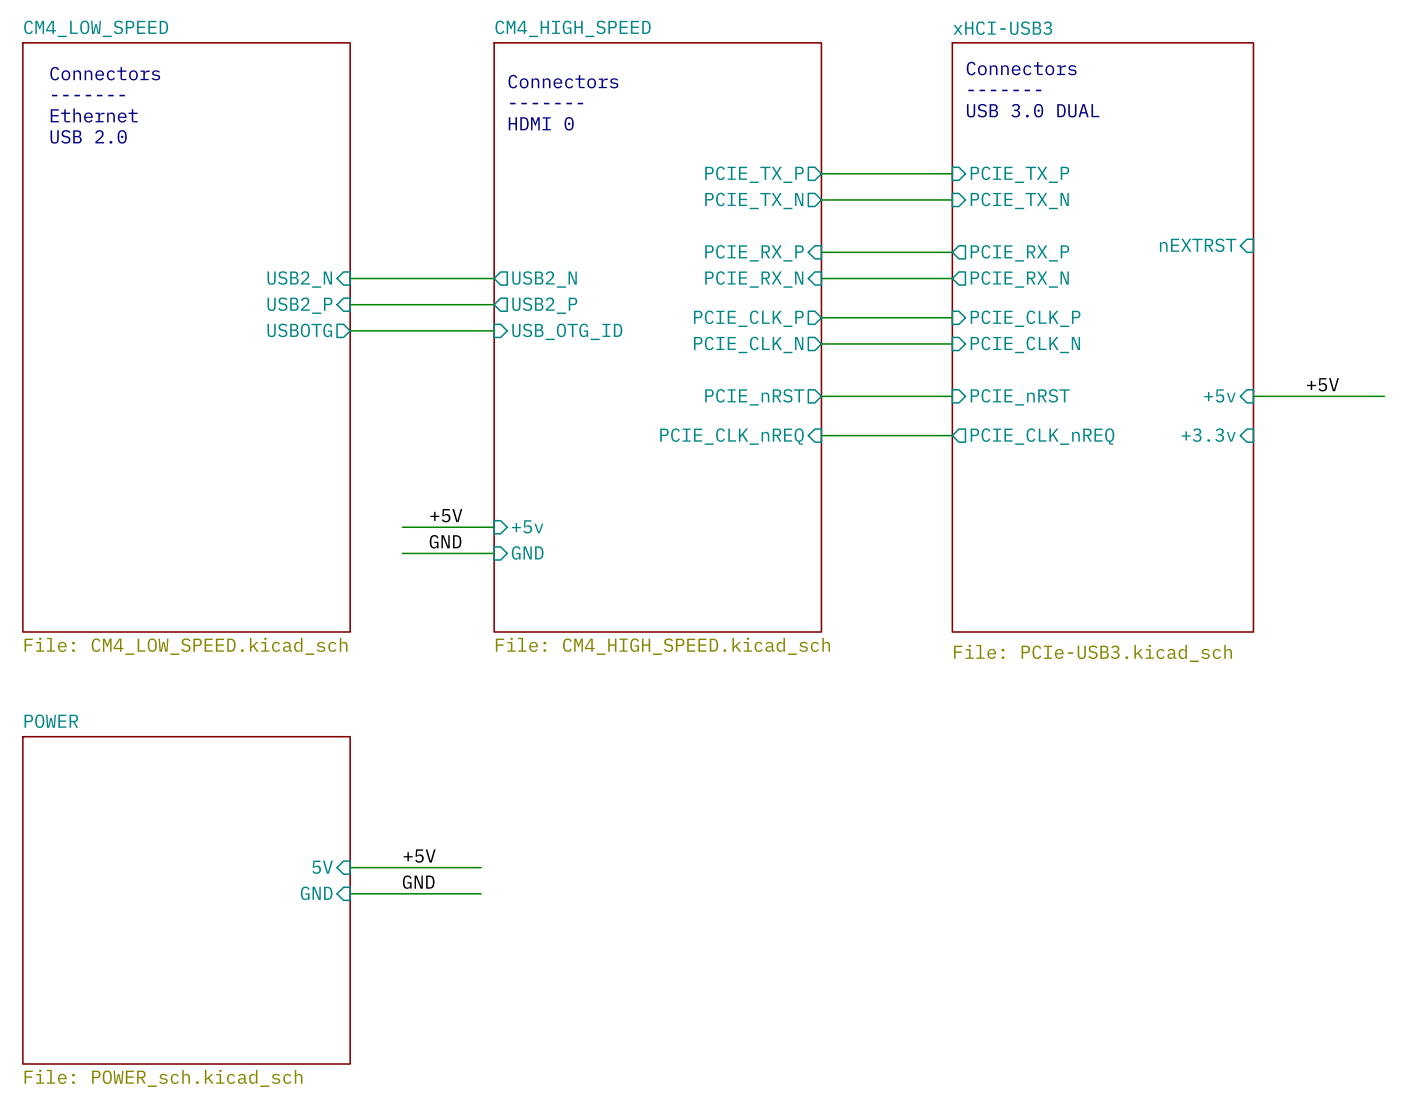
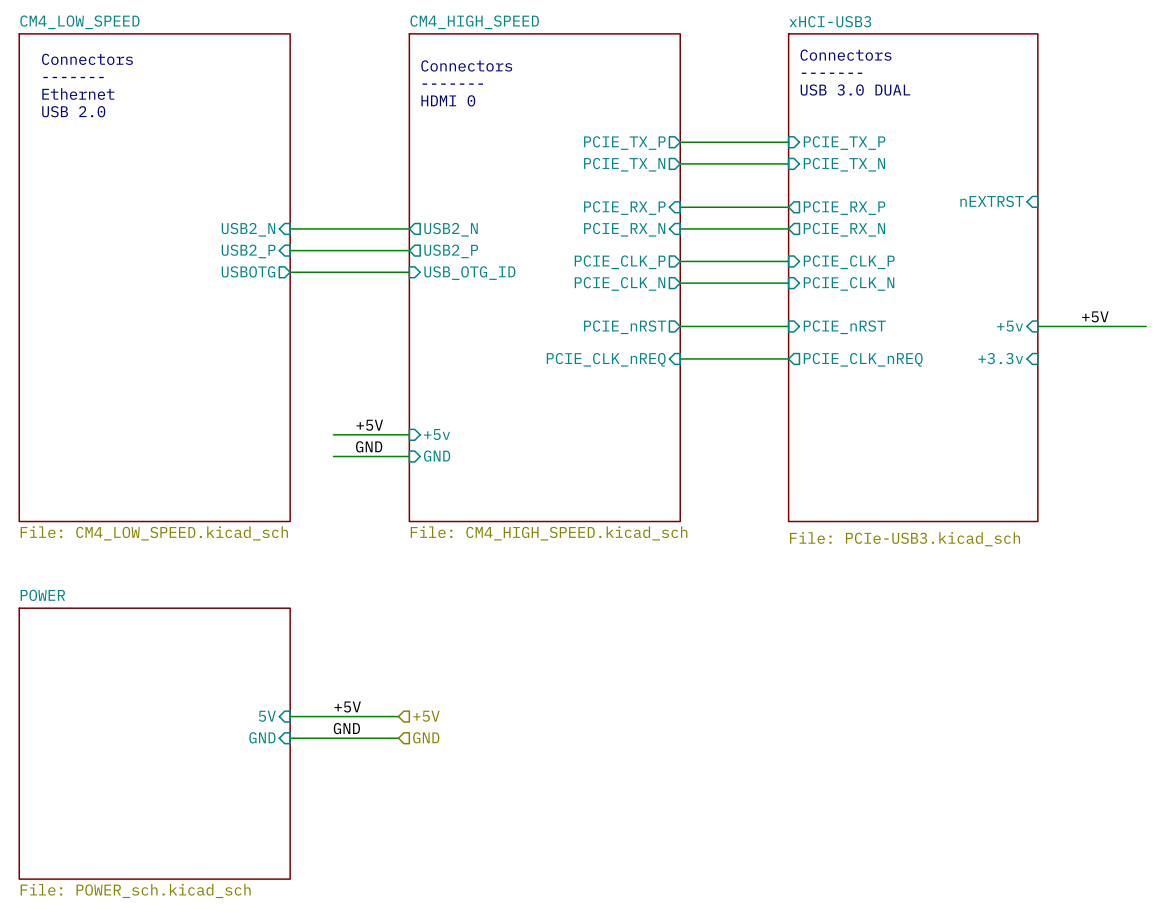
hierarchical label: none -> +5V (426, 716)
hierarchical label: none -> GND (426, 737)

